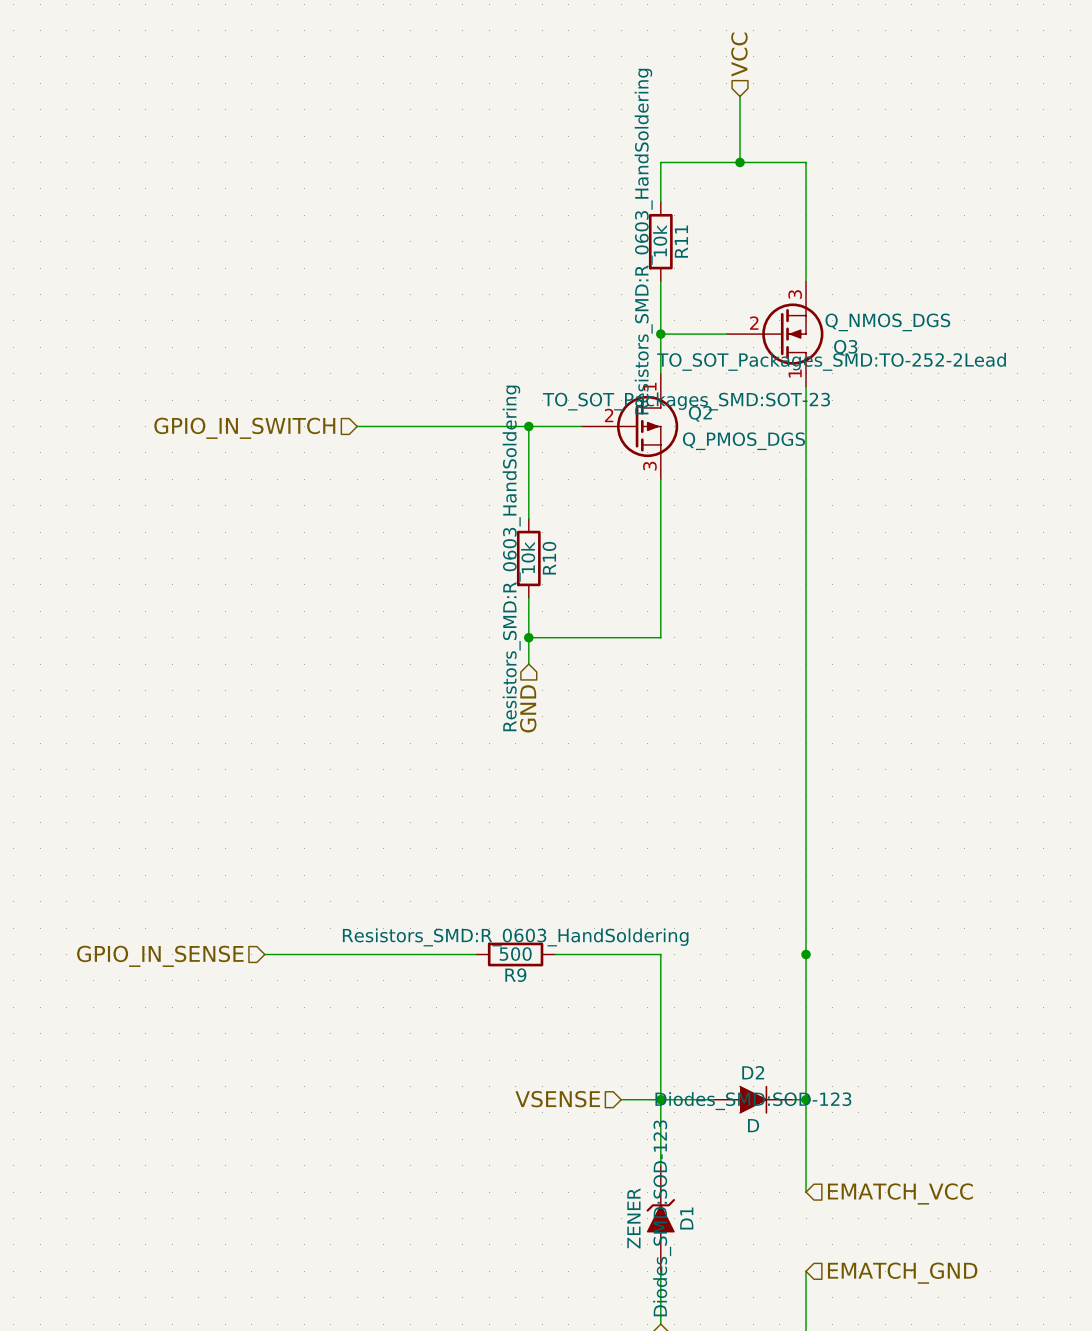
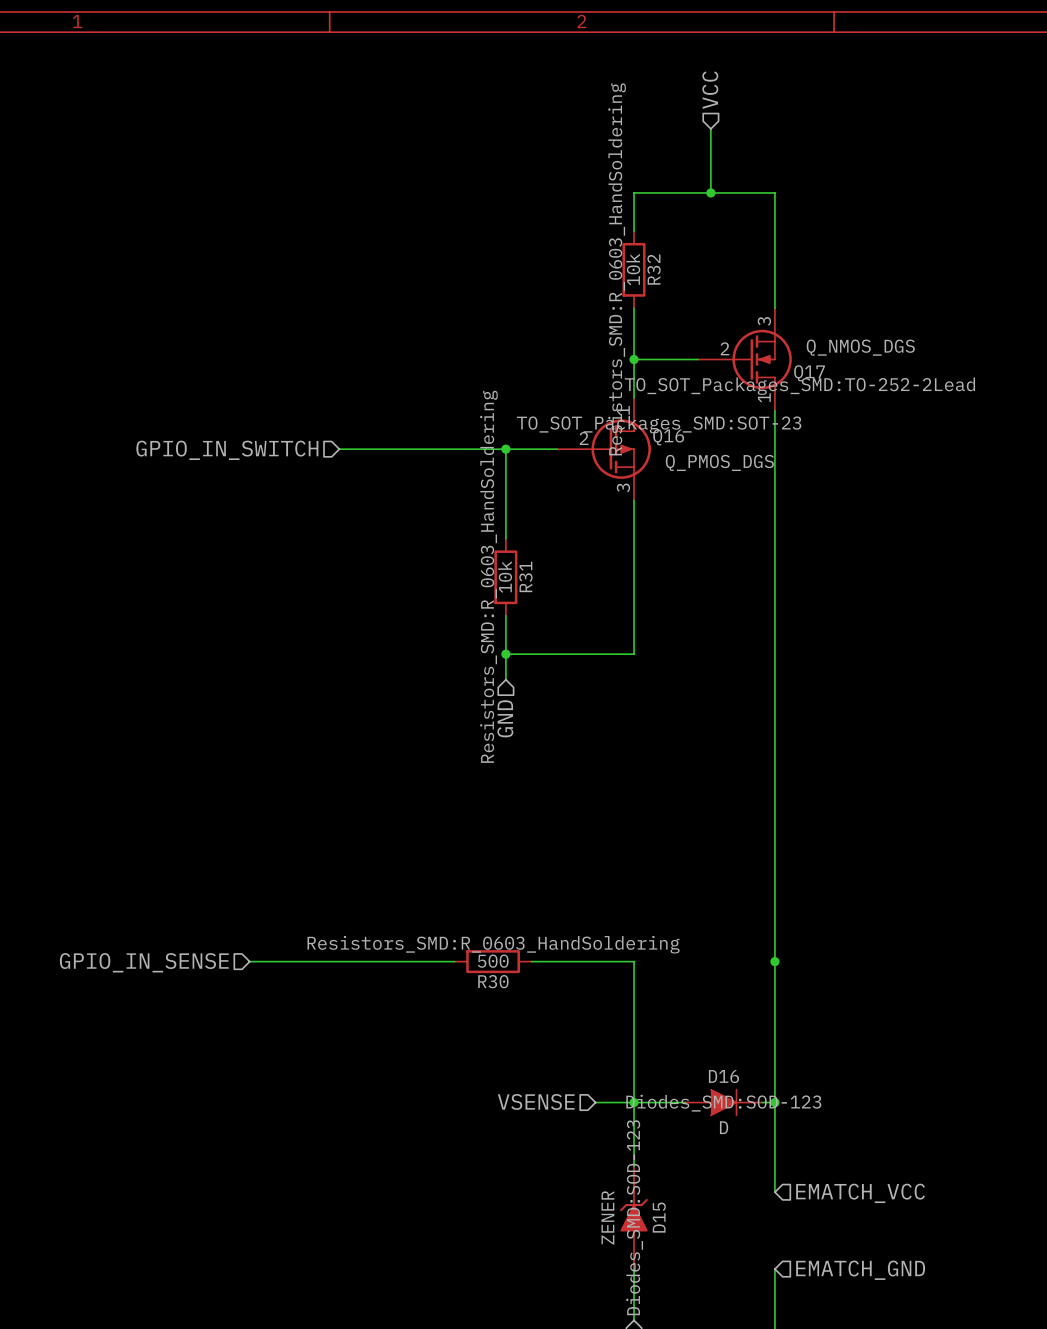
R11 name: R11 (681, 241) -> R32 (654, 269)
Q3 name: Q3 (845, 347) -> Q17 (809, 373)
Q2 name: Q2 (700, 413) -> Q16 (668, 437)
R10 name: R10 (549, 558) -> R31 (525, 576)
R9 name: R9 (515, 975) -> R30 (493, 981)
D2 name: D2 (753, 1072) -> D16 (723, 1076)
D1 name: D1 (686, 1218) -> D15 (659, 1217)

